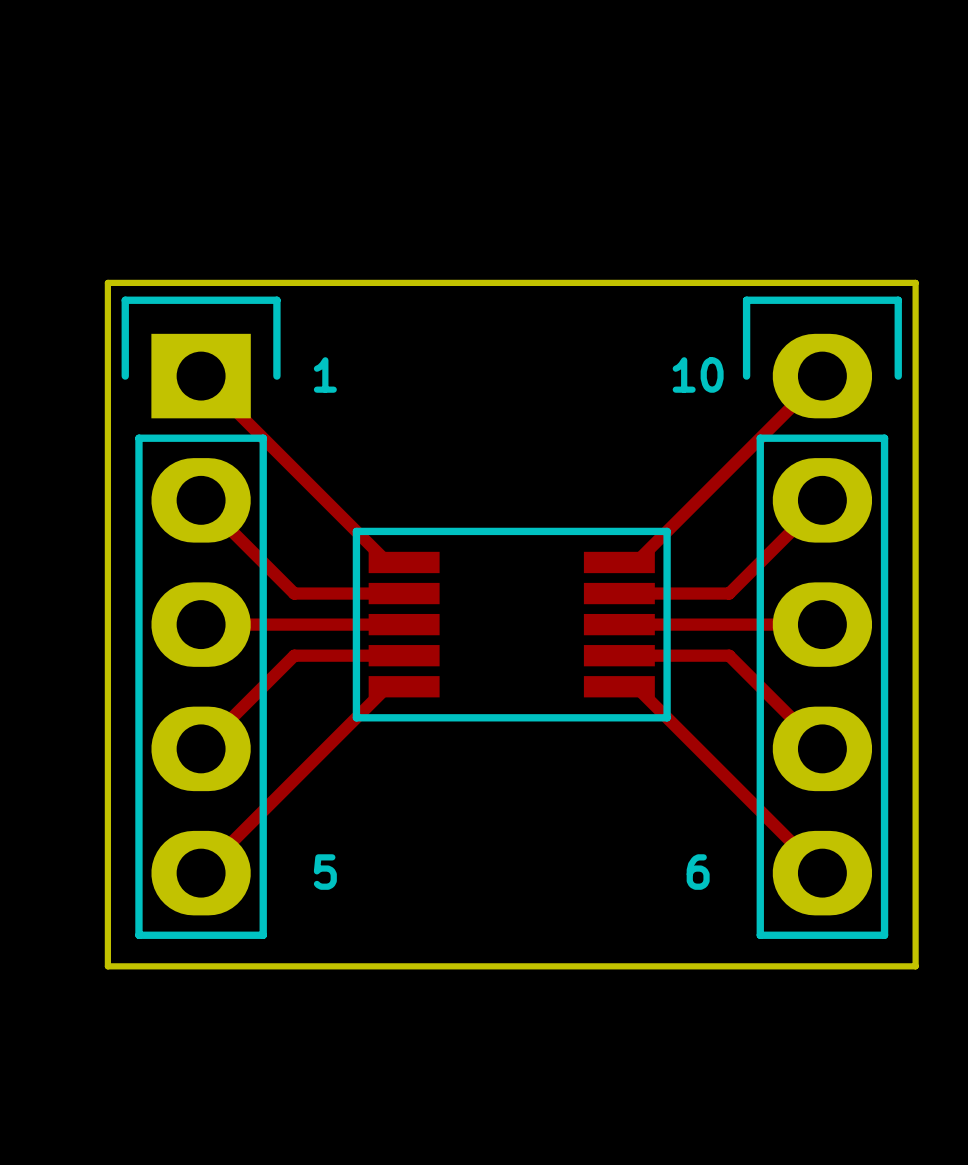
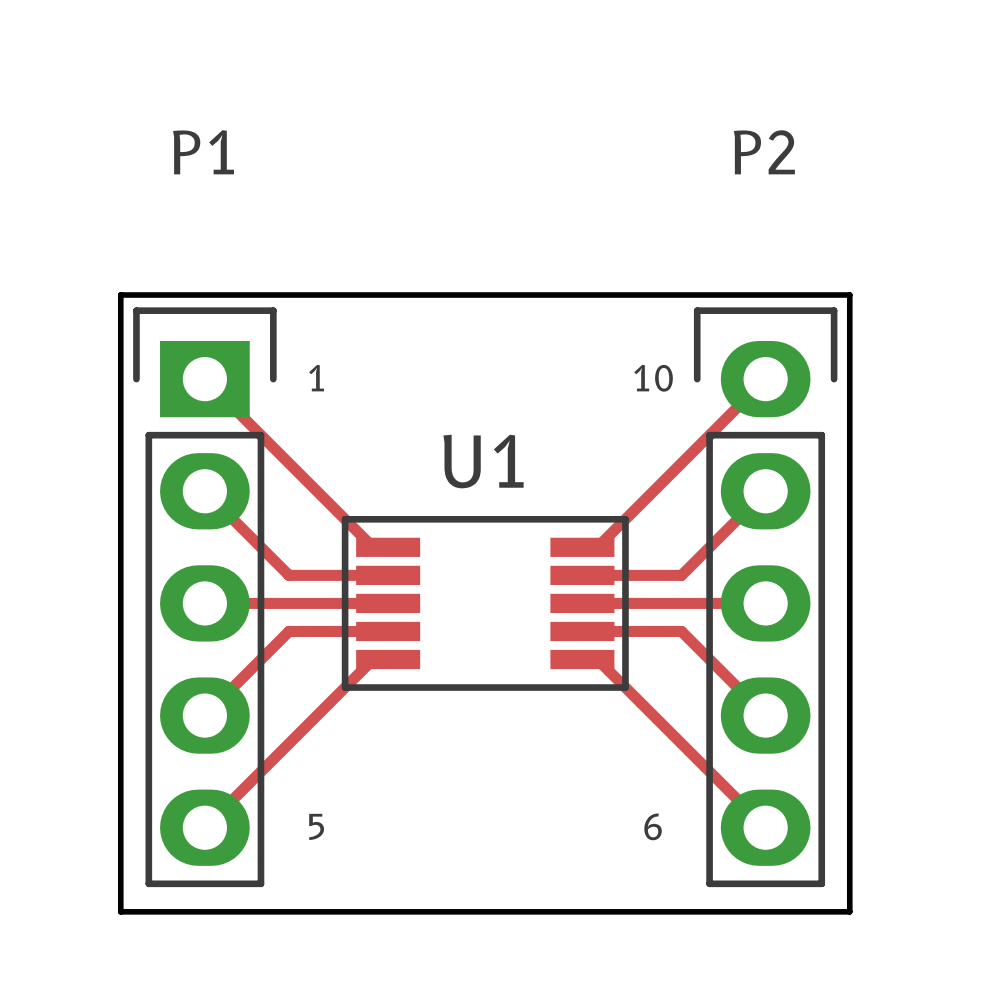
P1 name: none -> P1 (203, 152)
P2 name: none -> P2 (764, 152)
U1 name: none -> U1 (483, 461)

